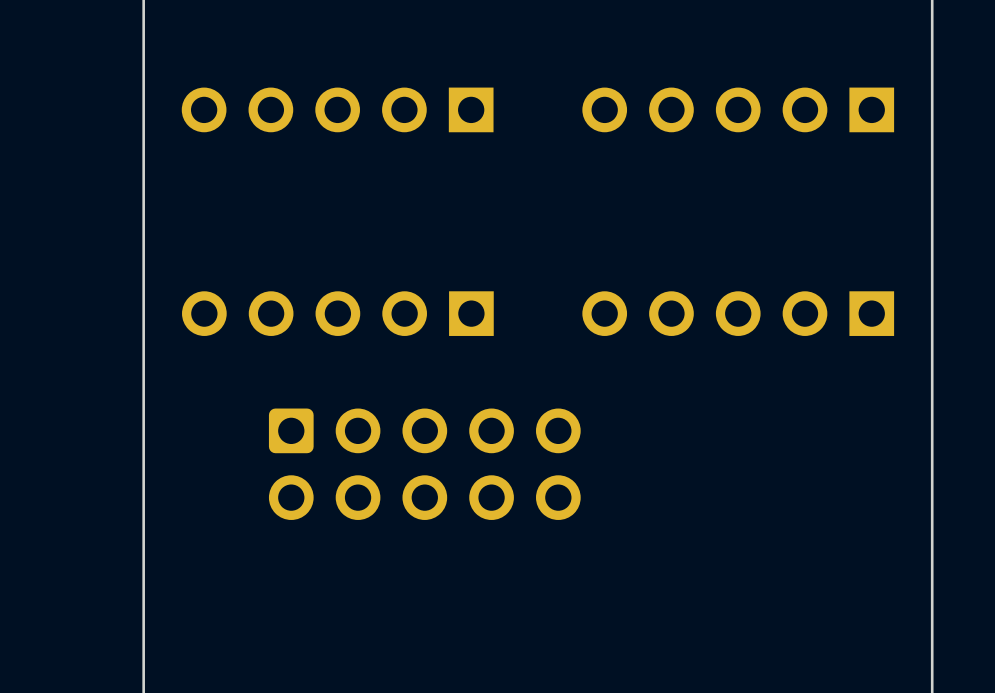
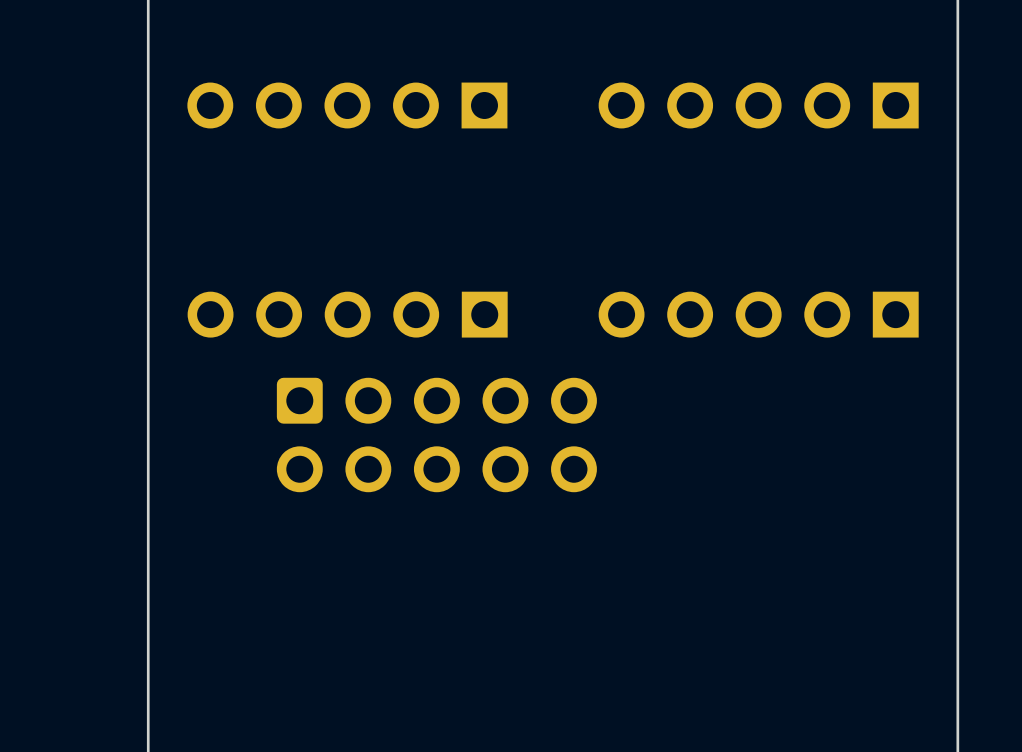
part position: (424, 464) -> (436, 434)

